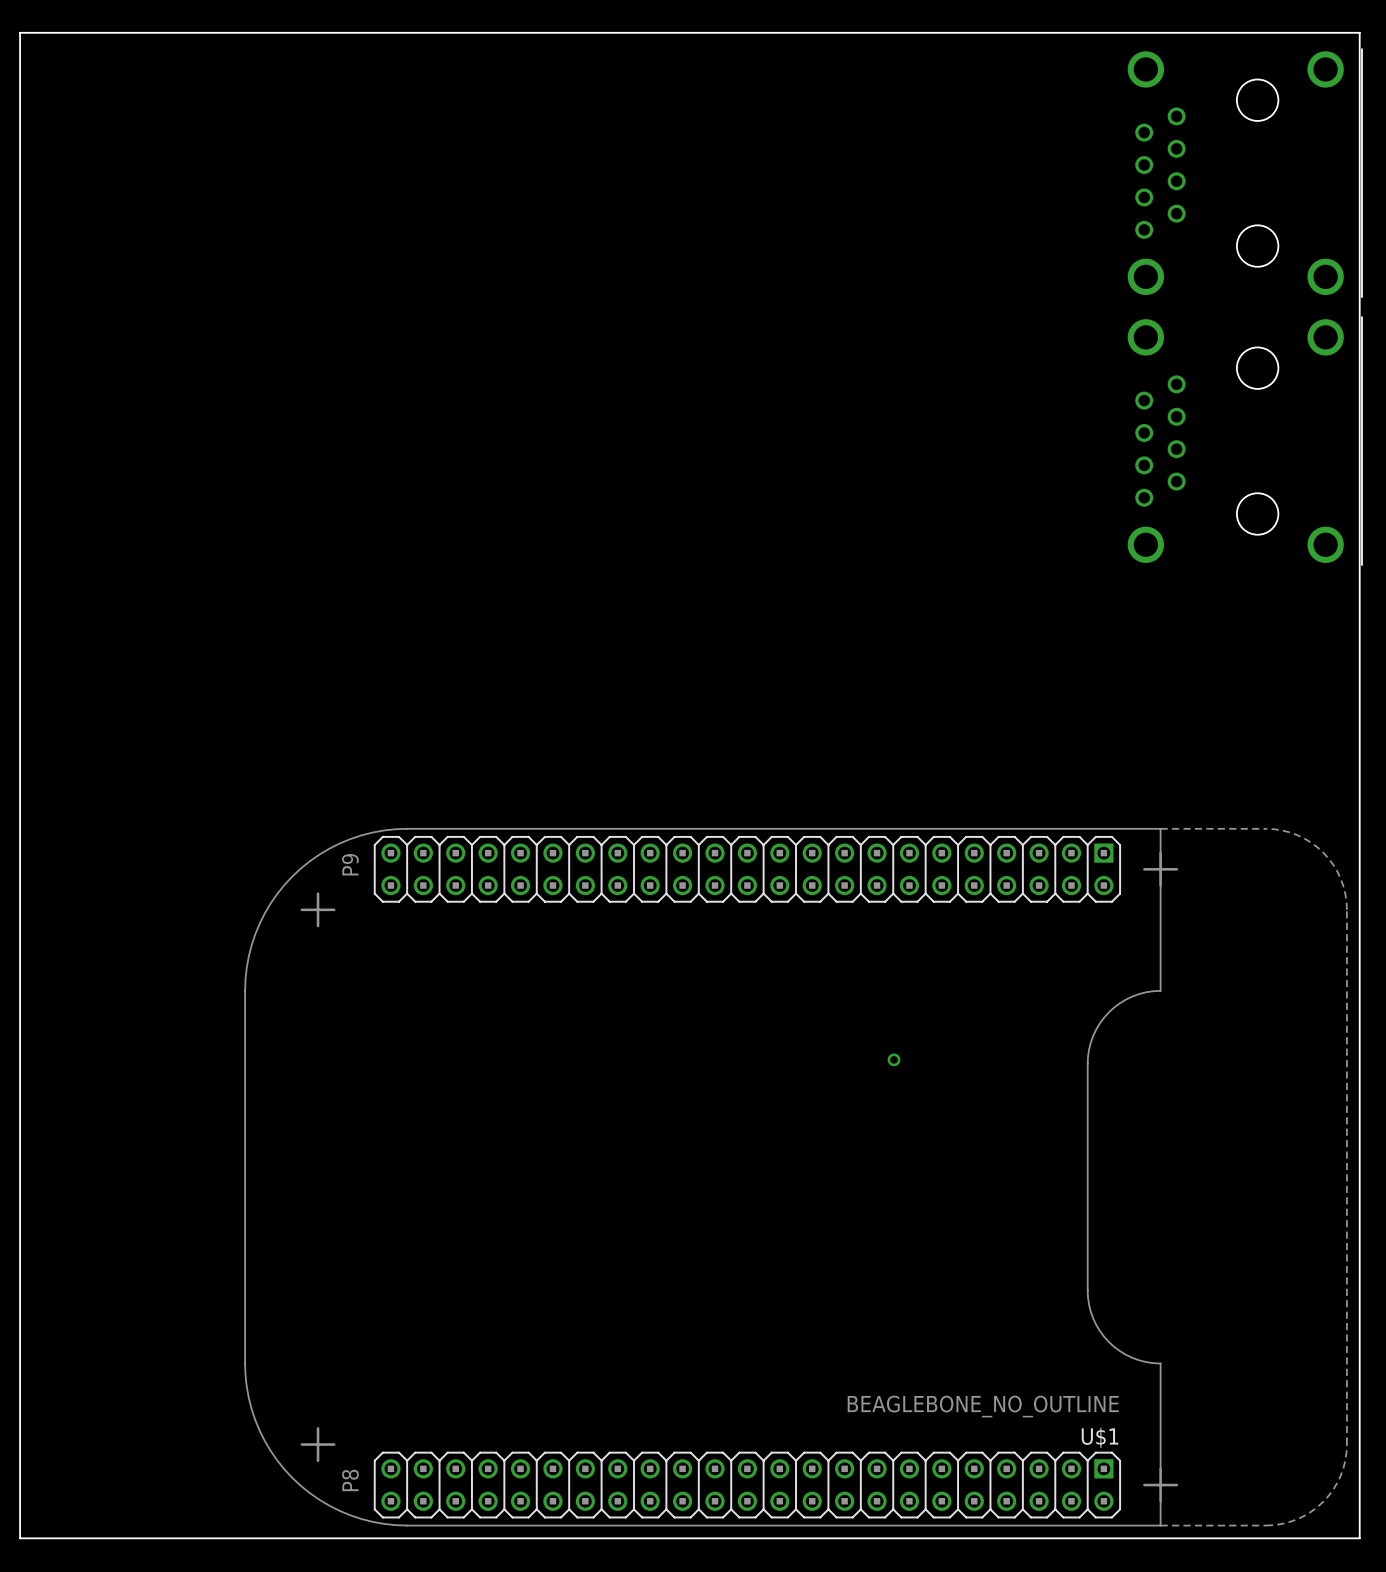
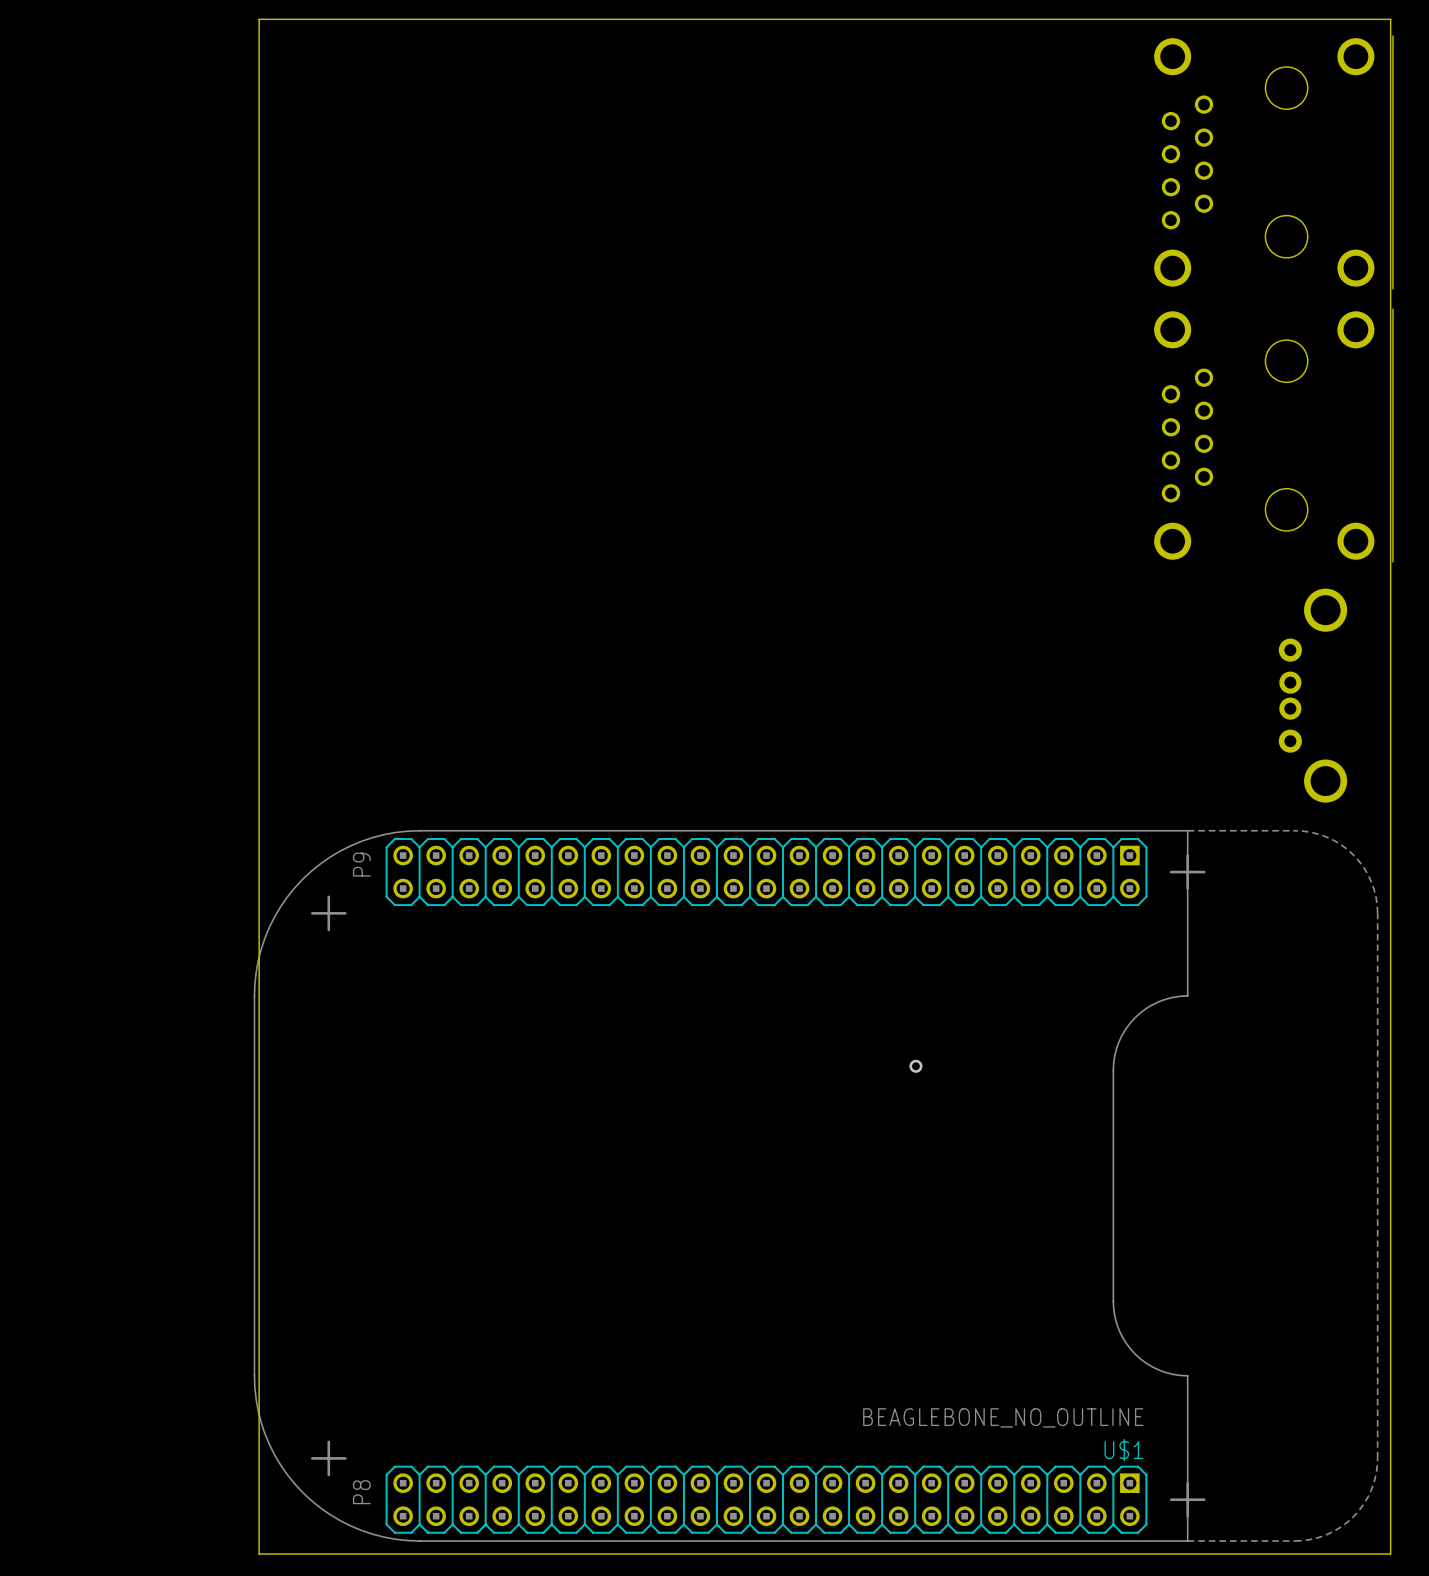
board edge: (249, 32) (20, 32) (20, 1538) (249, 1538) -> (259, 19) (259, 1554)
part: none -> (1312, 695)

